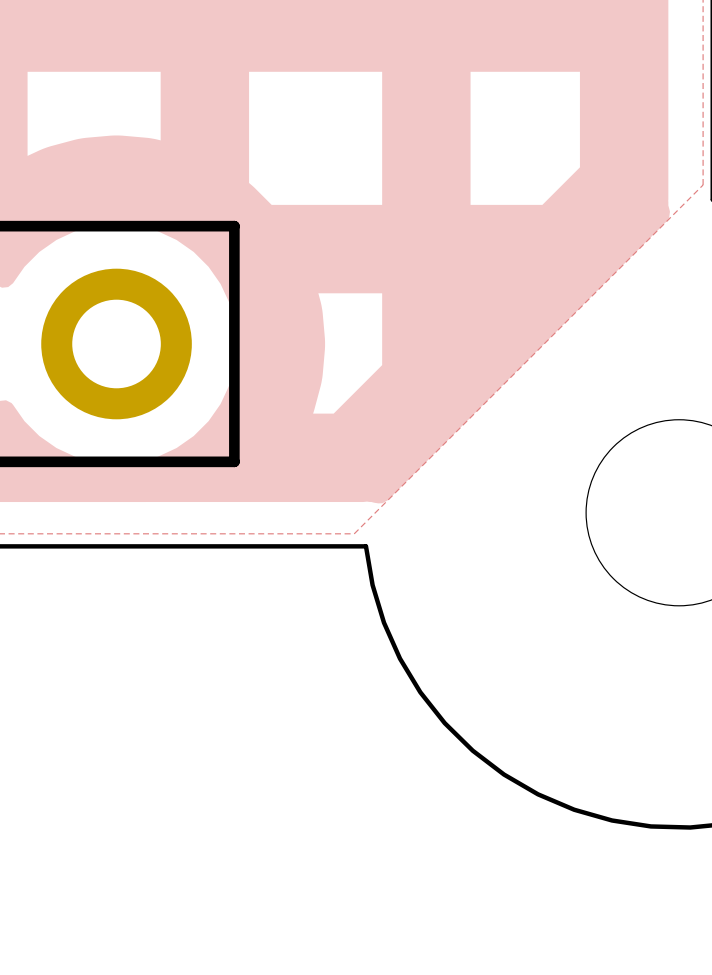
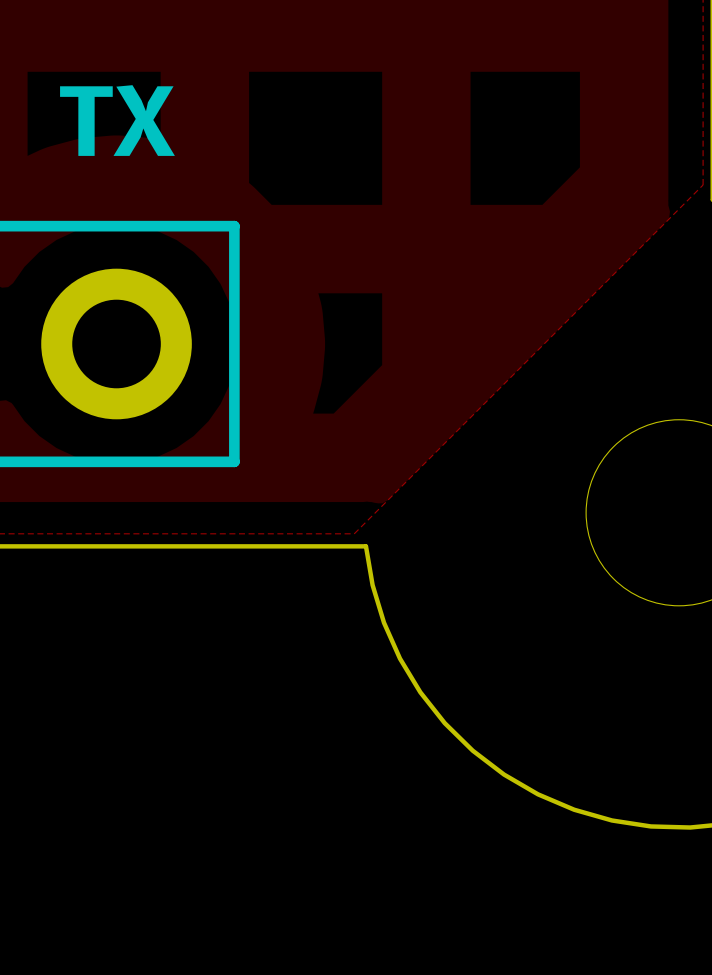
text: none -> TX (117, 120)

